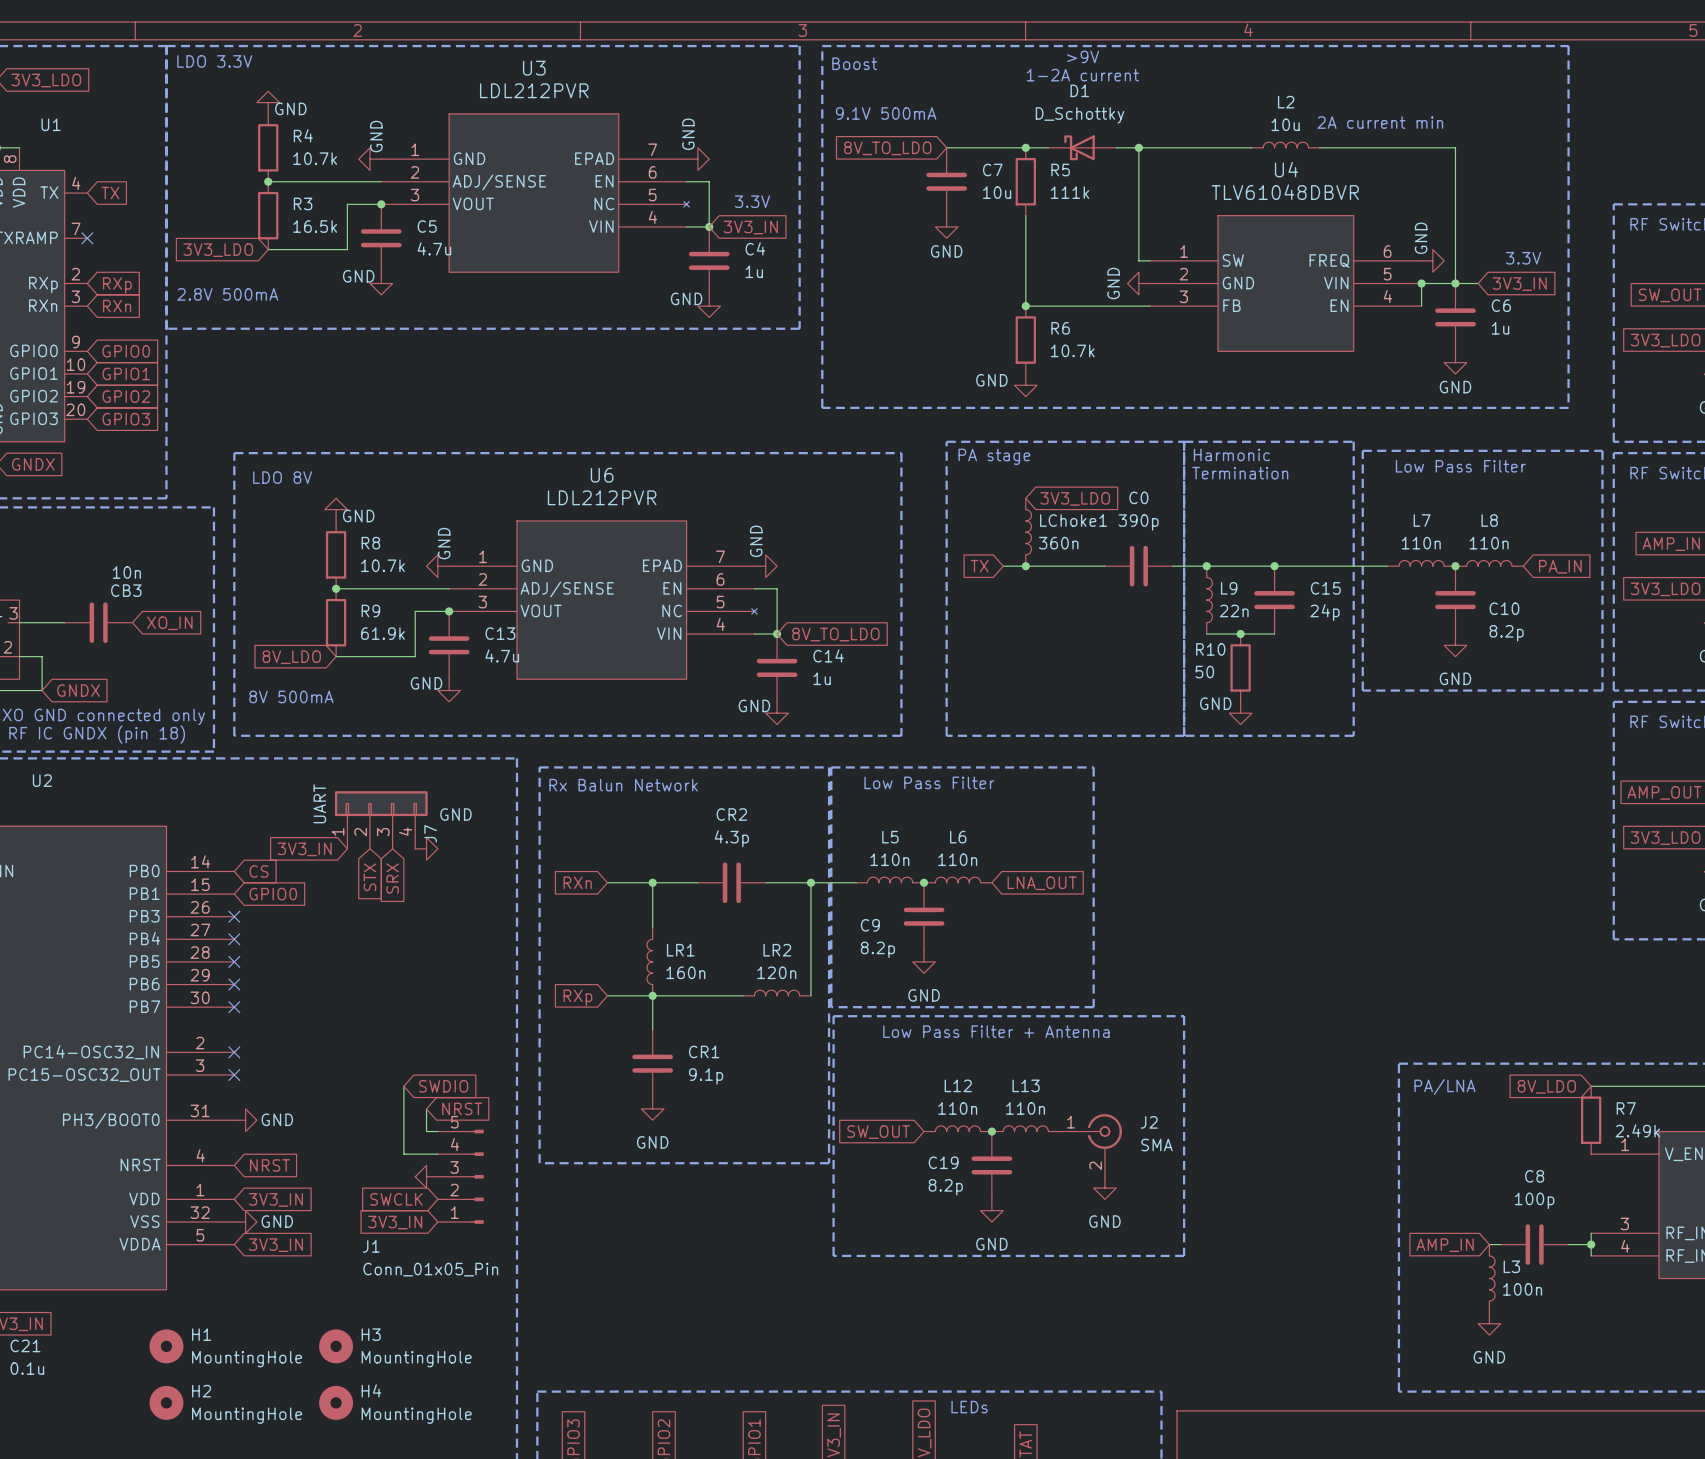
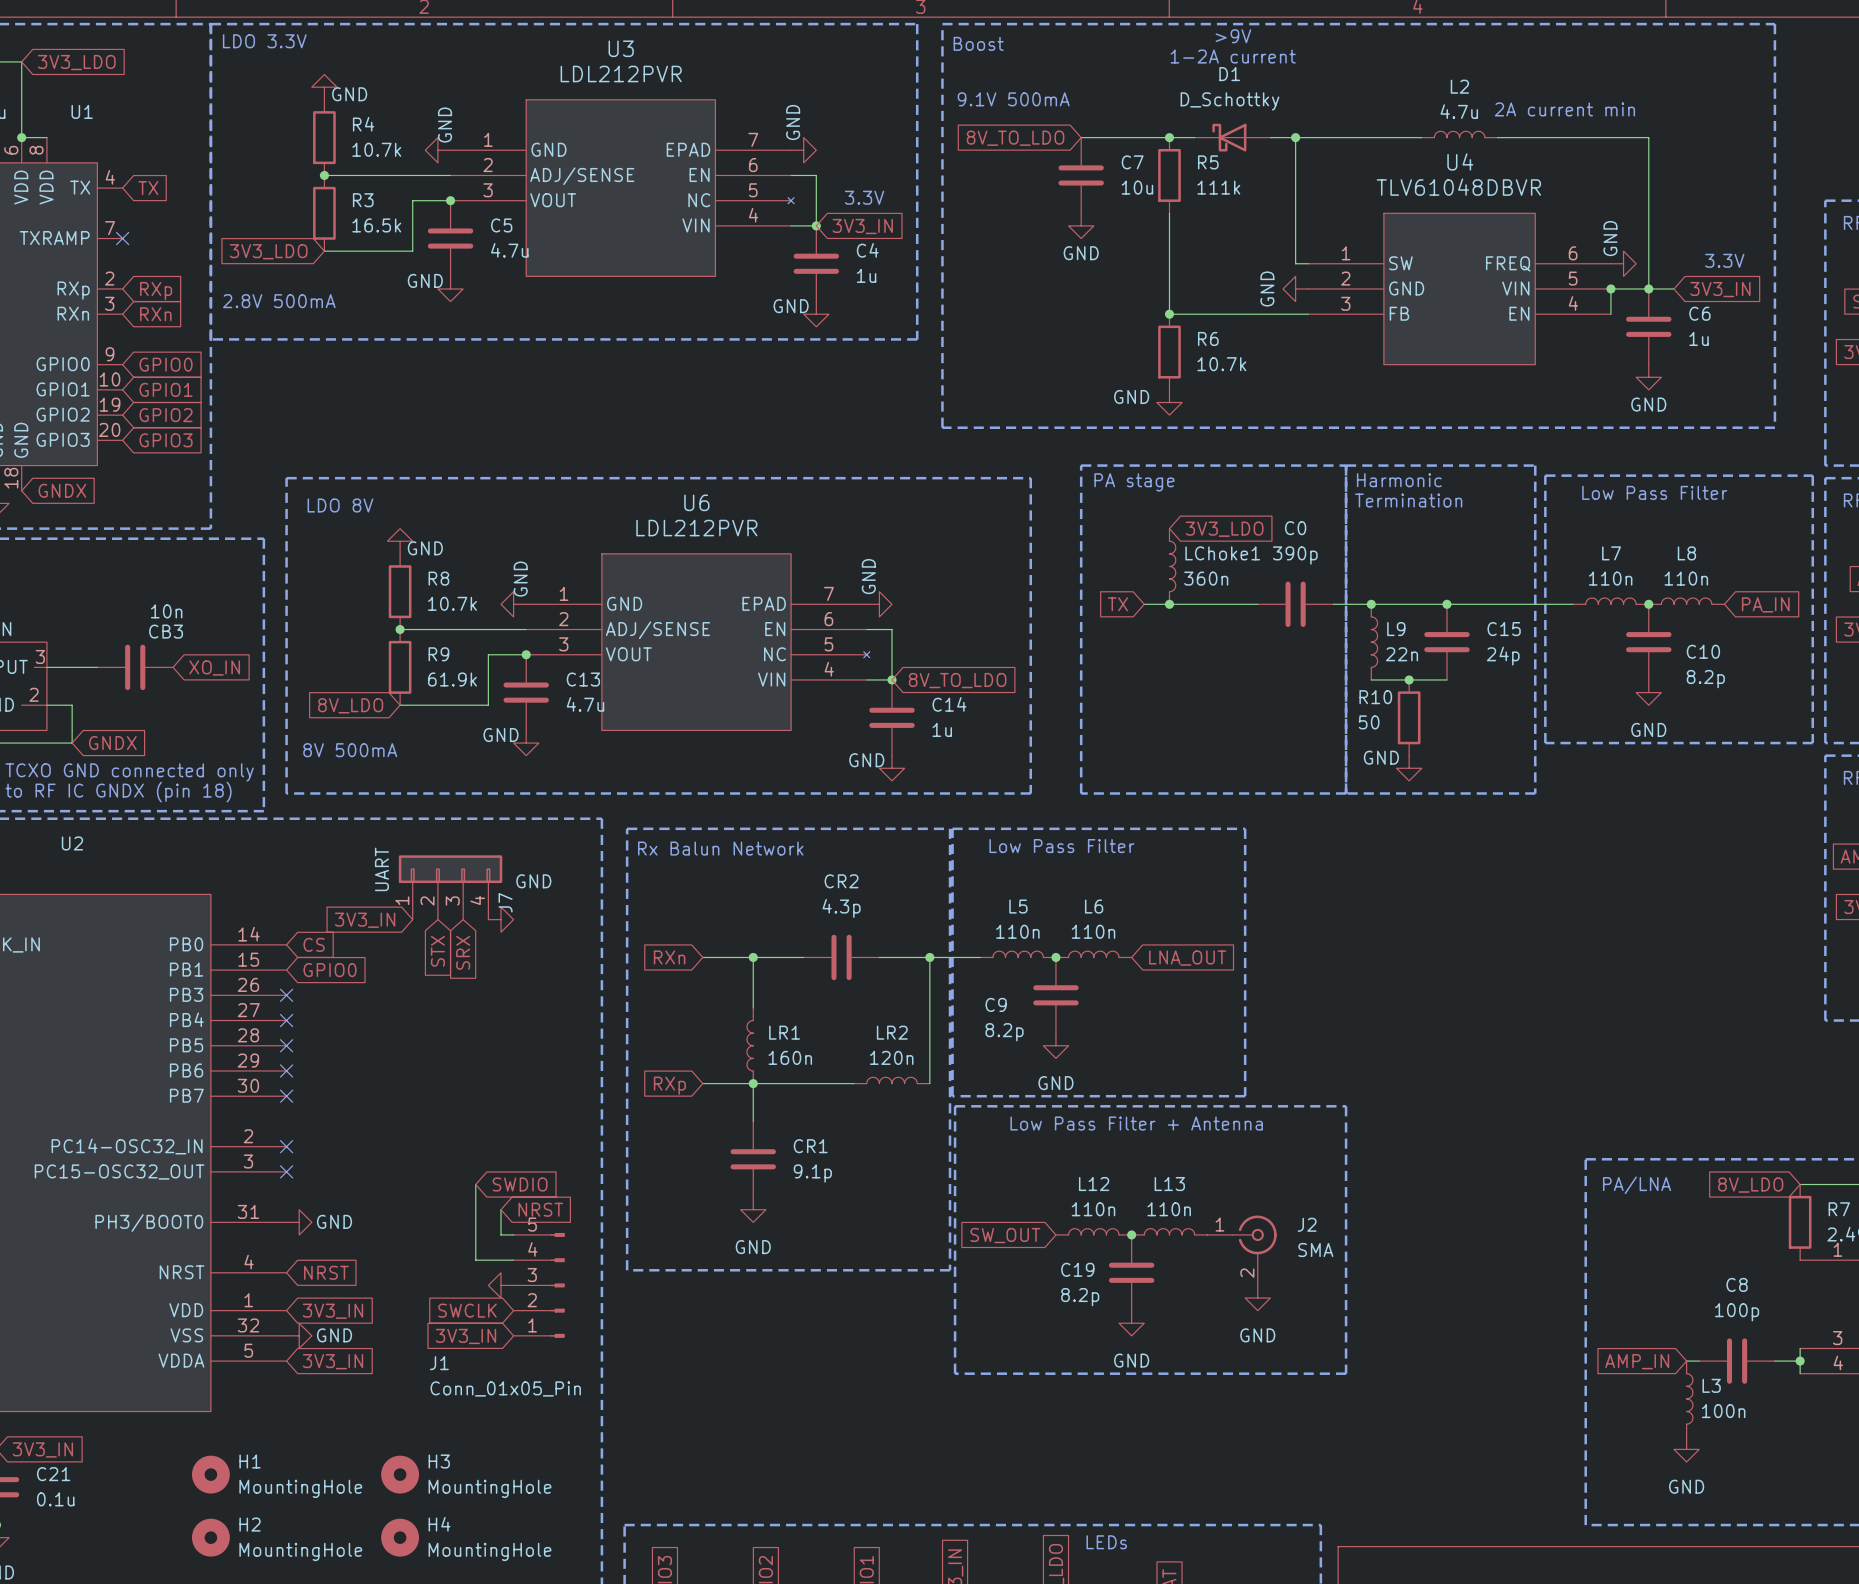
L2 value: 10u (1285, 124) -> 4.7u (1459, 111)

